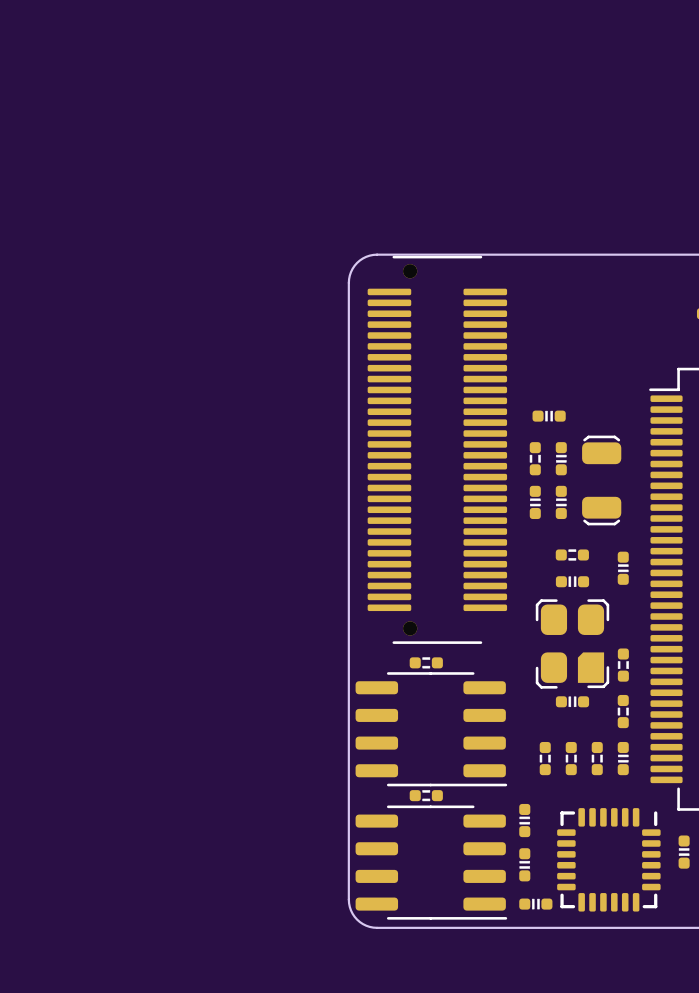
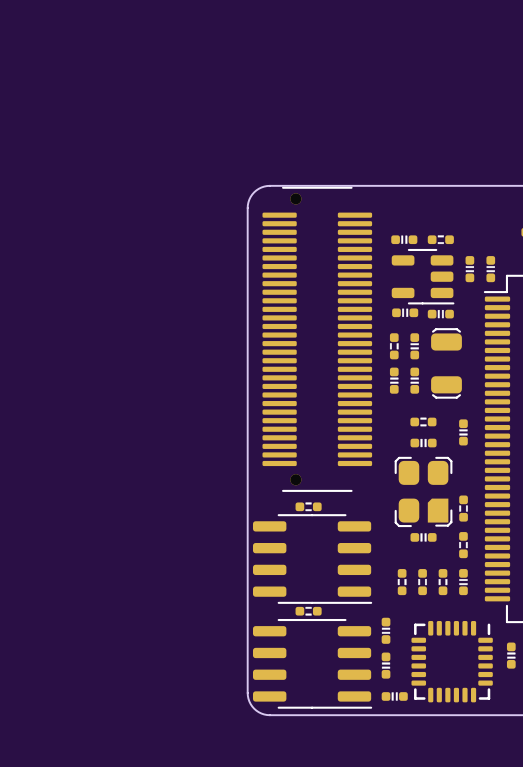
part: none -> (404, 239)
part: none -> (440, 239)
part: none -> (469, 269)
part: none -> (490, 269)
part: none -> (423, 276)
part: none -> (440, 314)

